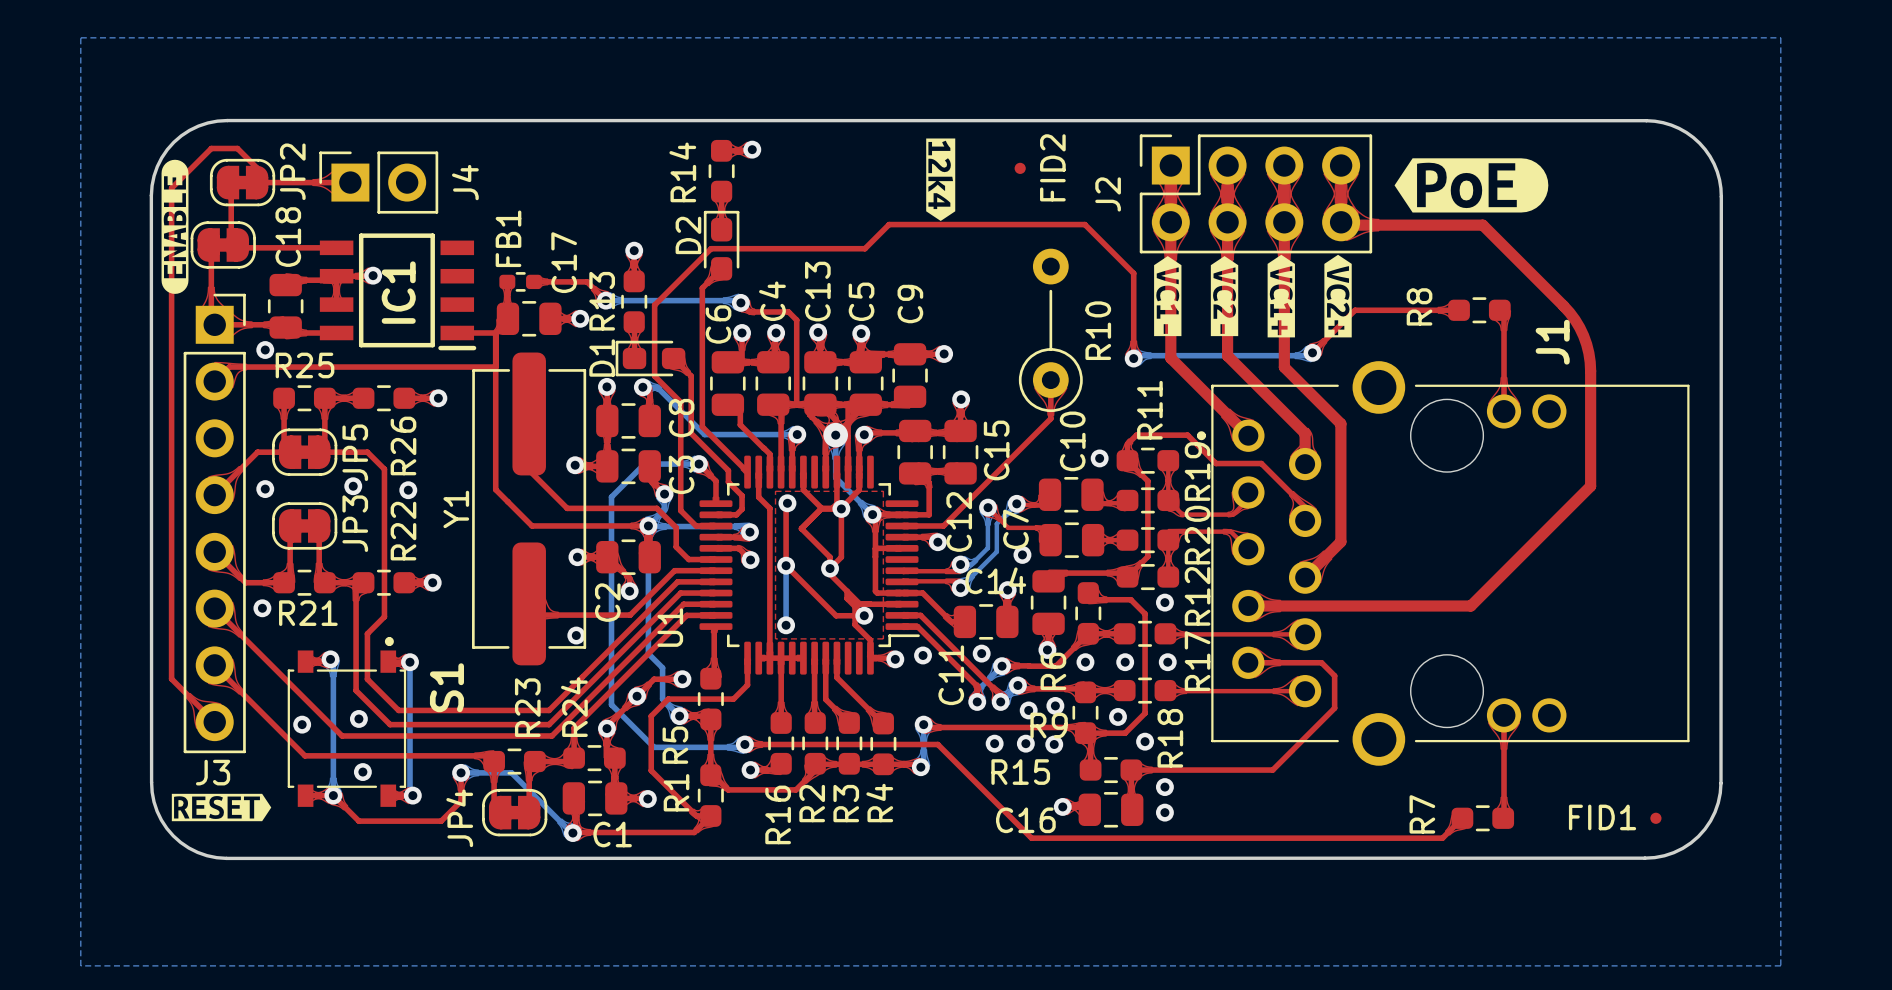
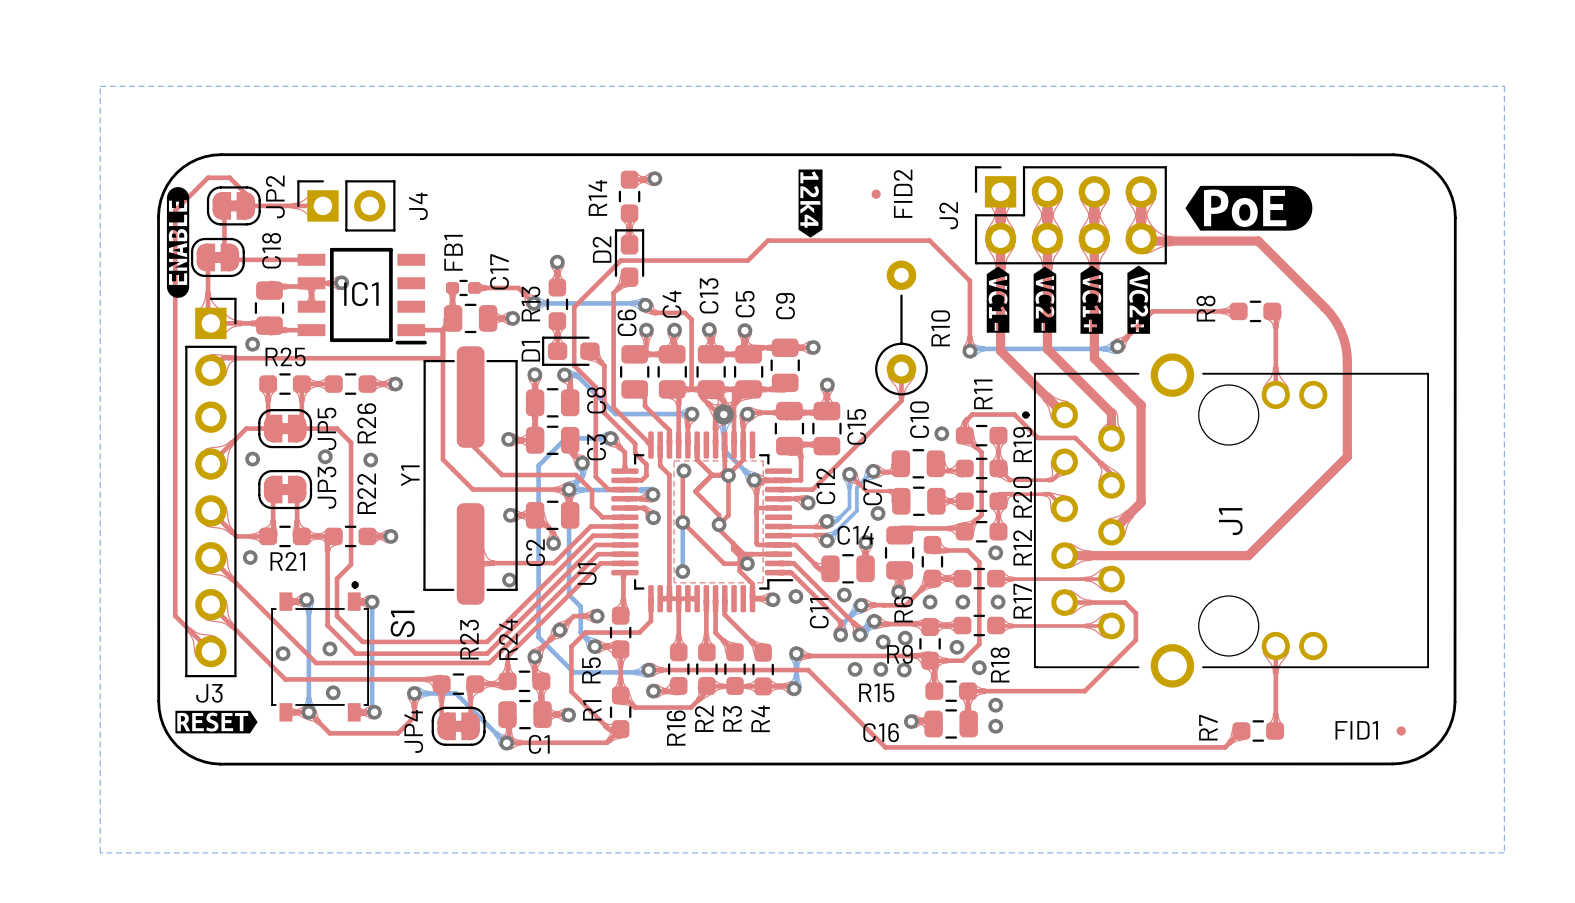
IC1 name rotation: 0° (398, 292) -> 90° clockwise (361, 294)
J1 name position: J1 (1552, 342) -> J1 (1230, 521)

